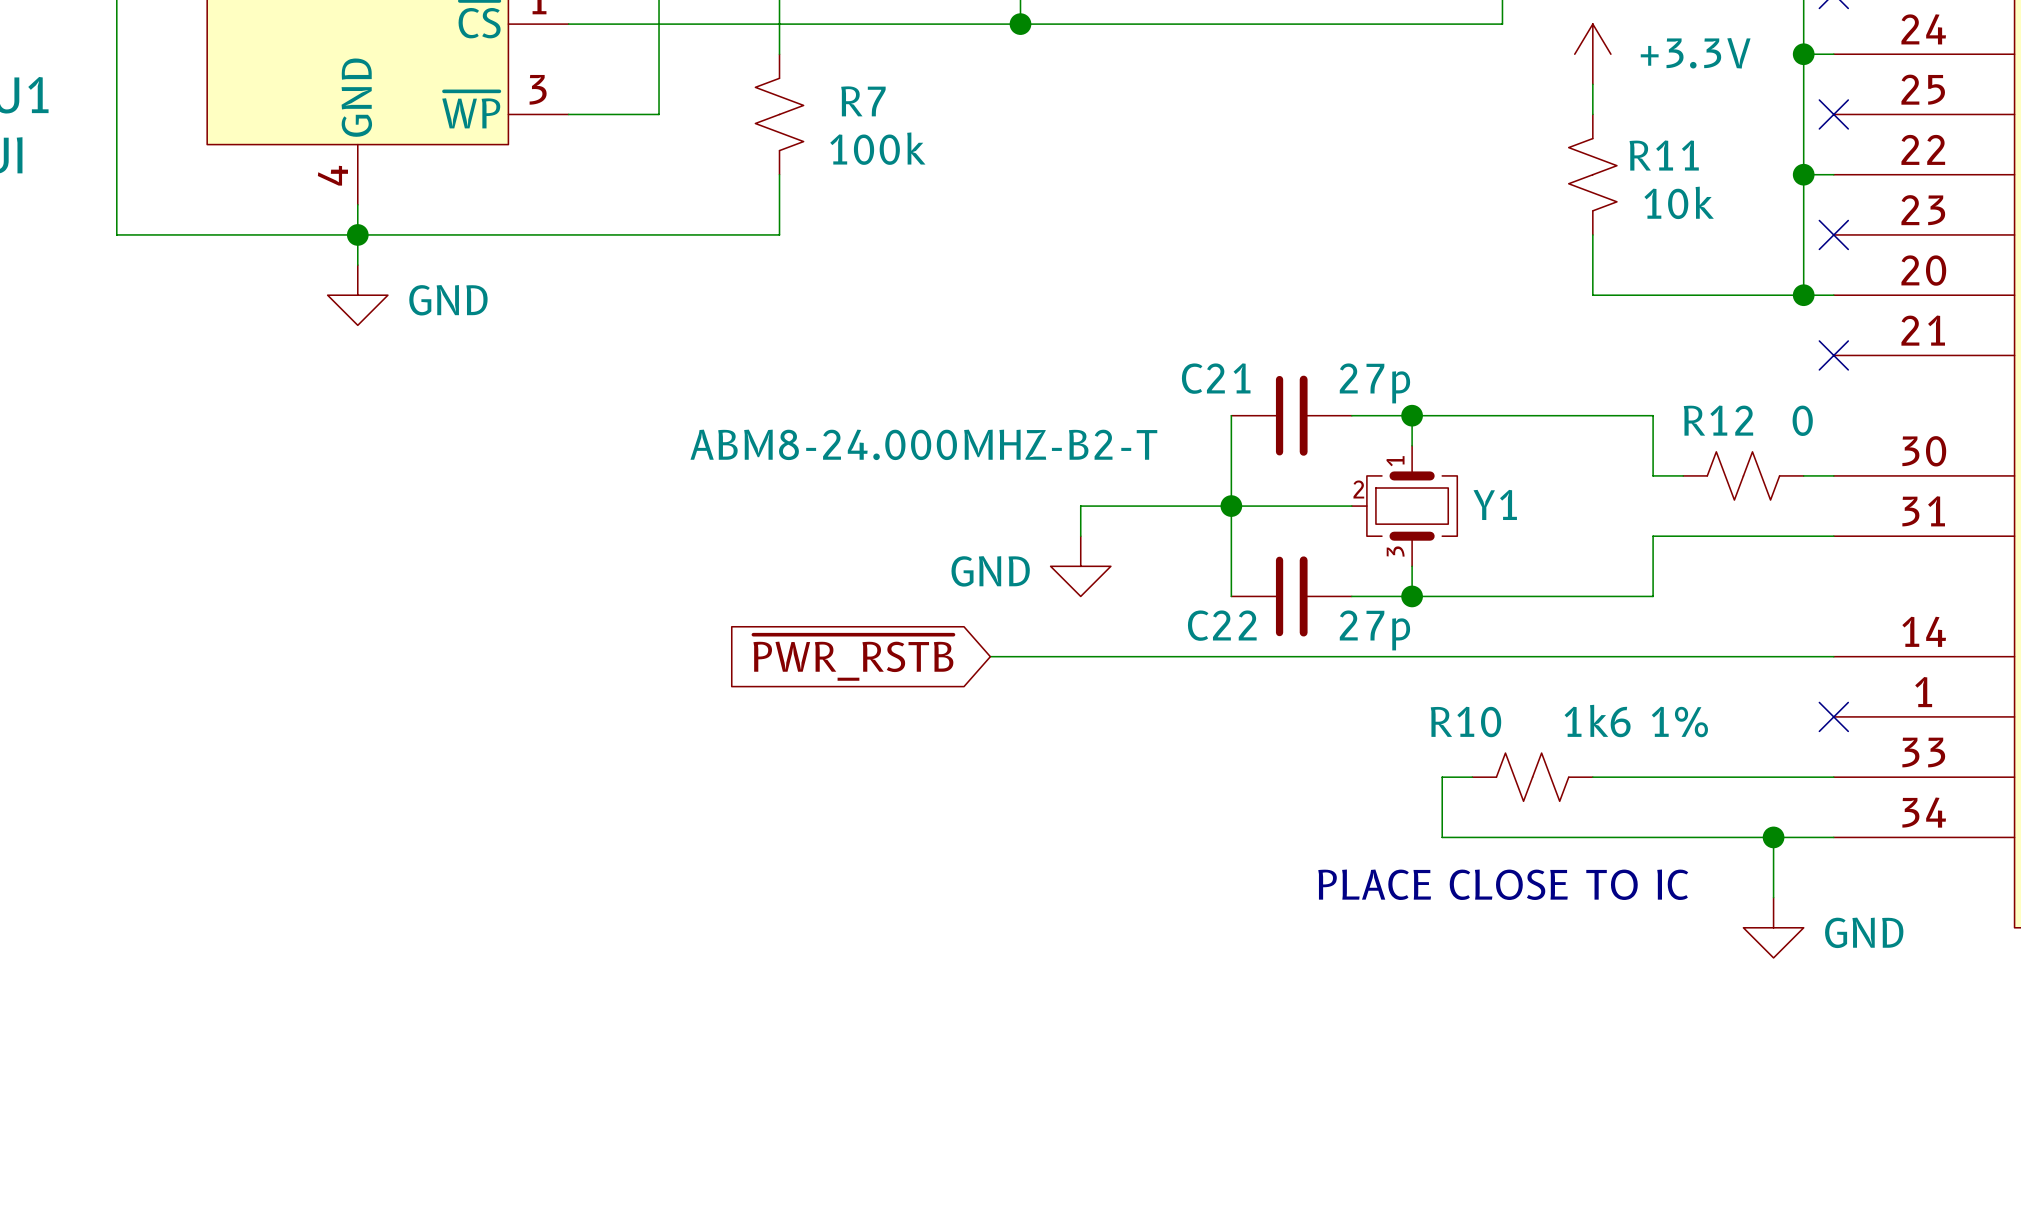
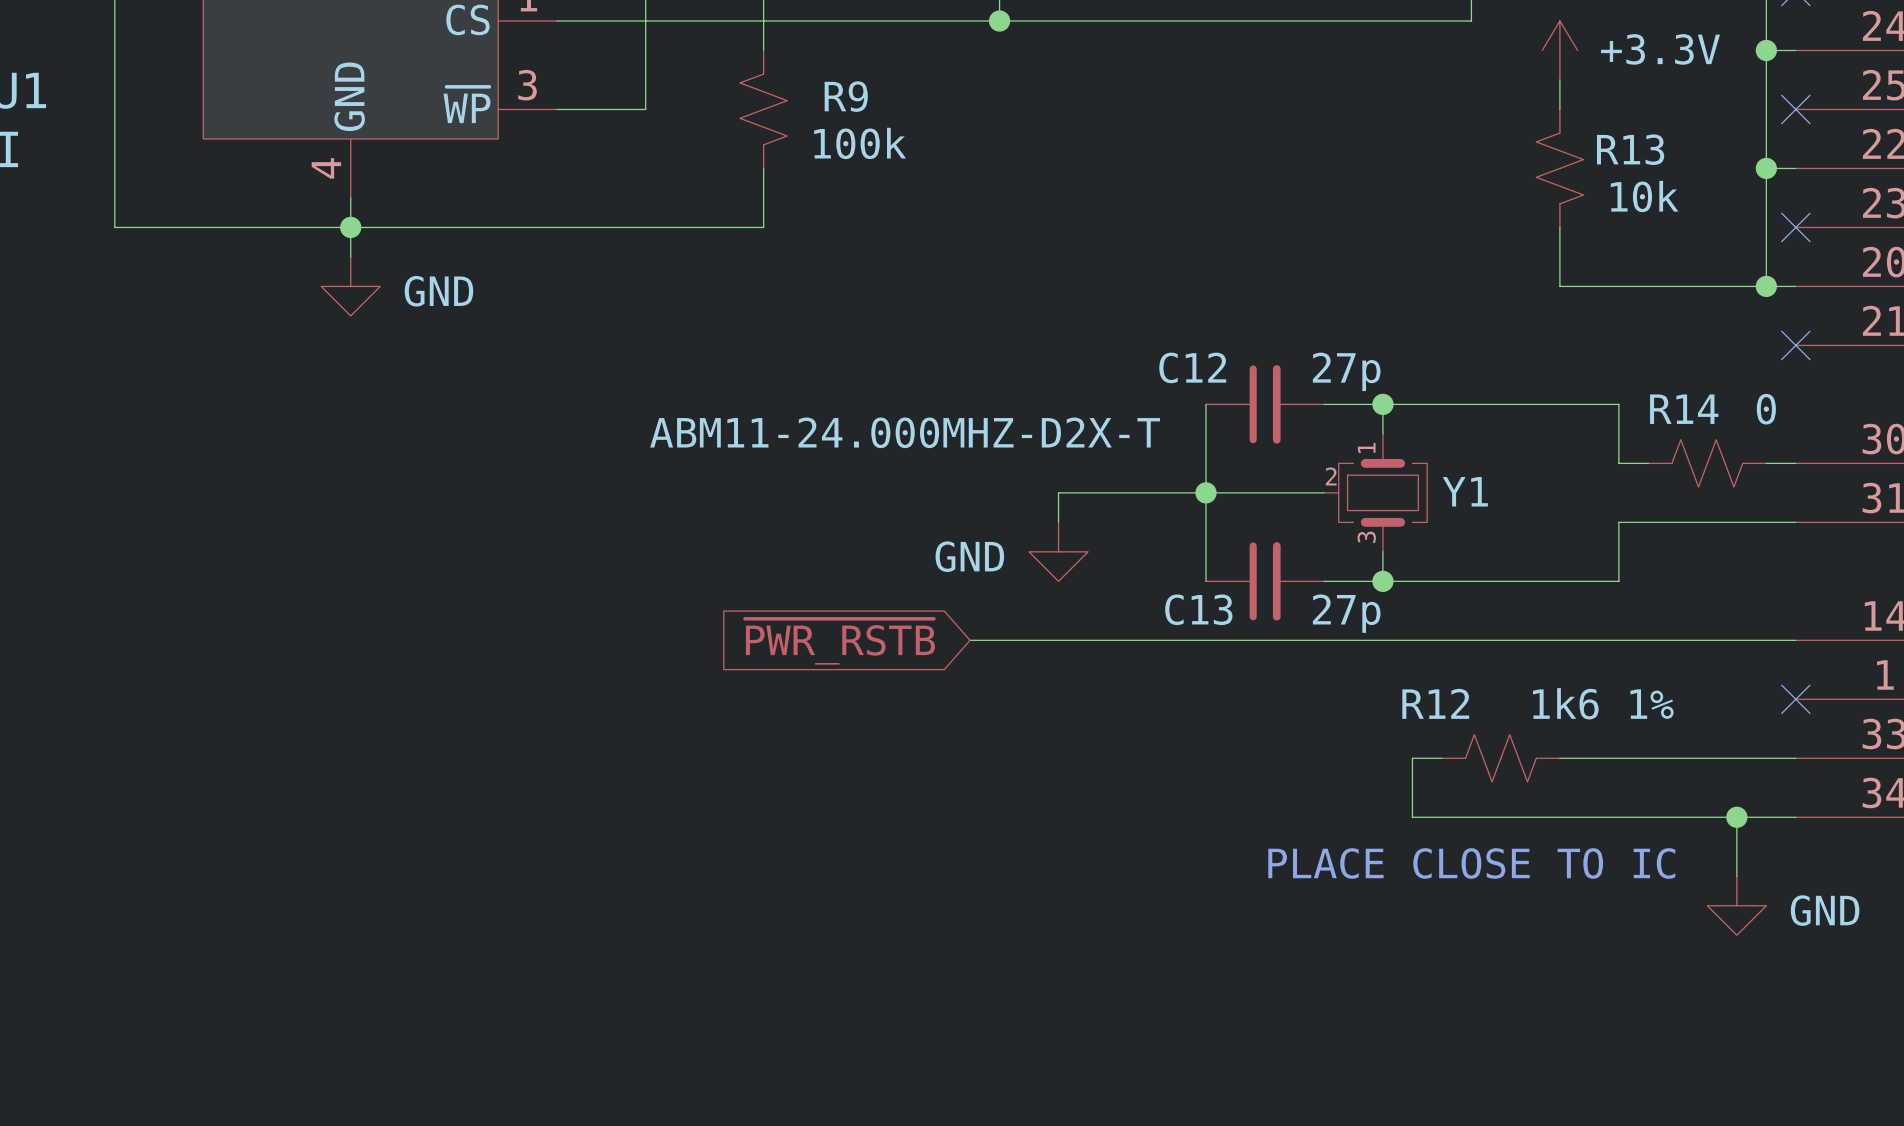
R7 name: R7 (863, 101) -> R9 (846, 96)
R11 name: R11 (1664, 155) -> R13 (1630, 149)
C21 name: C21 (1216, 378) -> C12 (1192, 367)
R12 name: R12 (1718, 420) -> R14 (1684, 409)
Y1 value: ABM8-24.000MHZ-B2-T (923, 444) -> ABM11-24.000MHZ-D2X-T (905, 432)
C22 name: C22 (1222, 625) -> C13 (1198, 609)
R10 name: R10 (1465, 722) -> R12 (1435, 703)

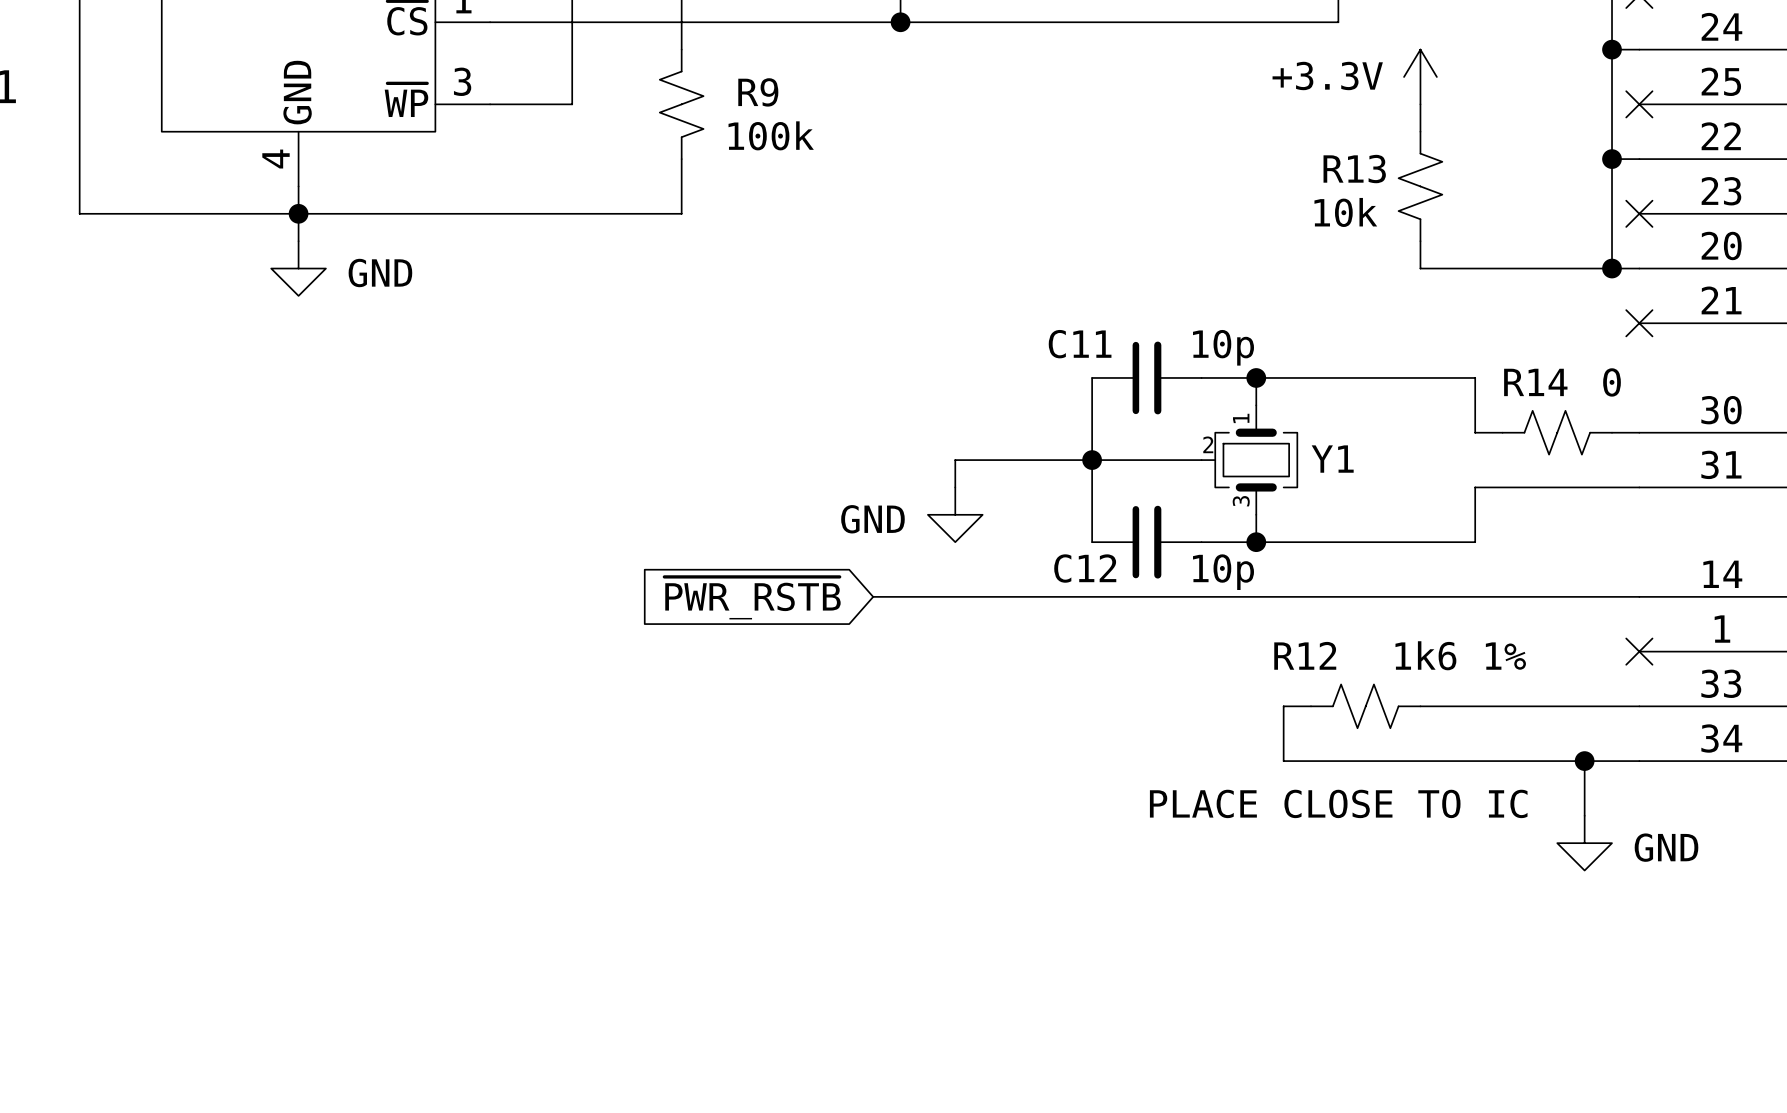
power symbol text position: +3.3V (1660, 49) -> +3.3V (1327, 75)
power symbol position: +3.3V (1559, 50) -> +3.3V (1420, 76)
R13 flip: as is (1559, 168) -> left-right (1420, 186)
C12 name: C12 (1192, 367) -> C11 (1080, 344)
C12 value: 27p (1346, 371) -> 10p (1223, 347)
Y1 value: ABM11-24.000MHZ-D2X-T (905, 432) -> none
C13 name: C13 (1198, 609) -> C12 (1085, 568)
C13 value: 27p (1346, 613) -> 10p (1223, 572)

